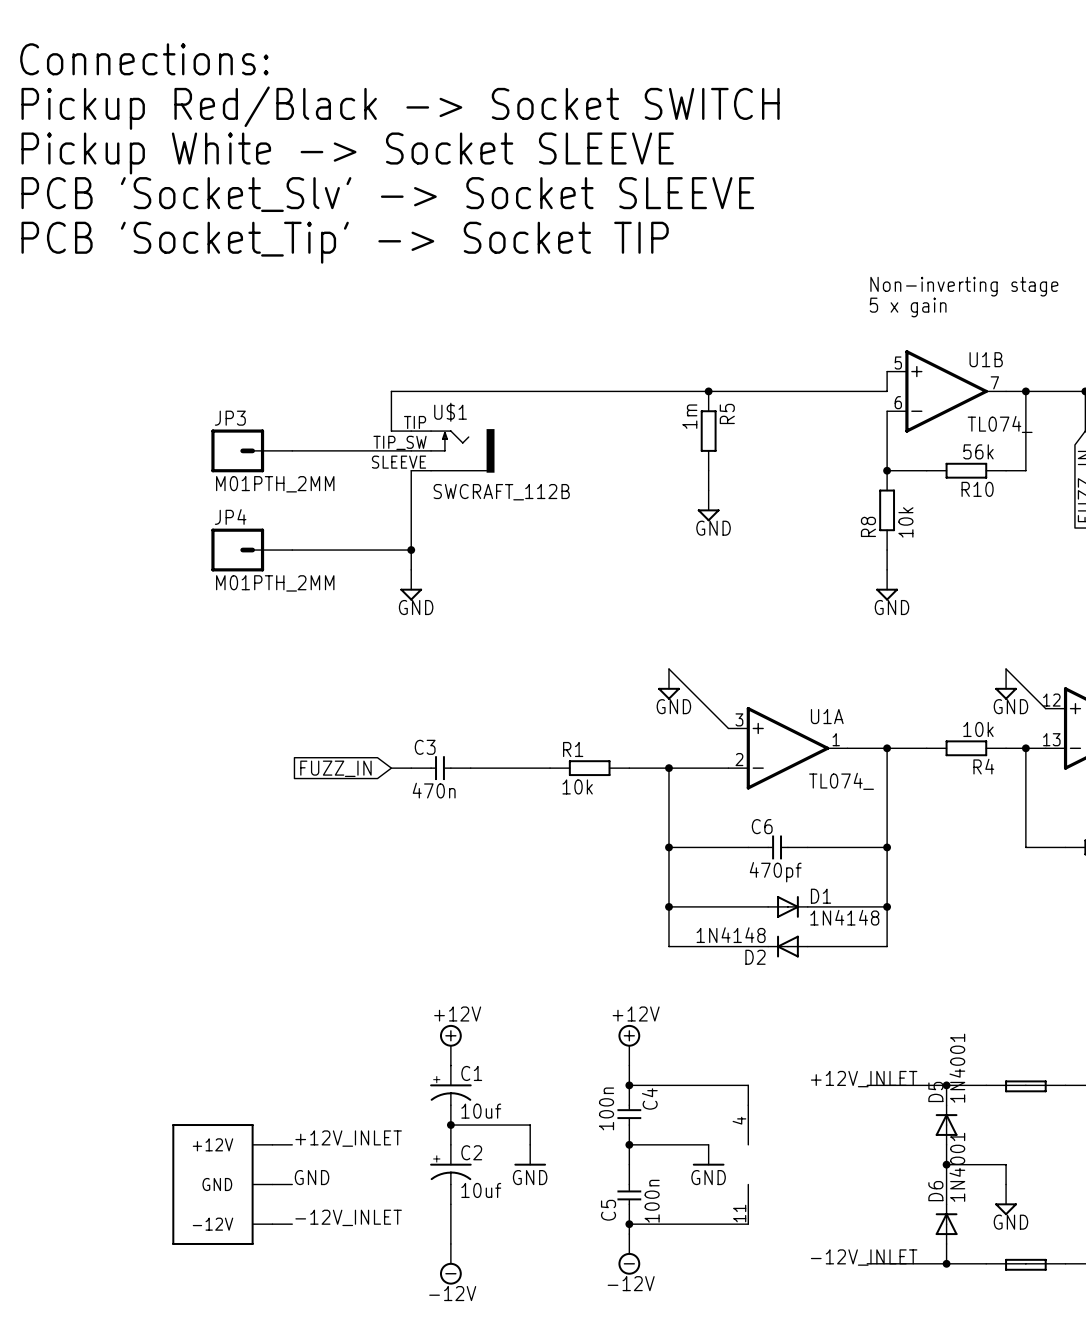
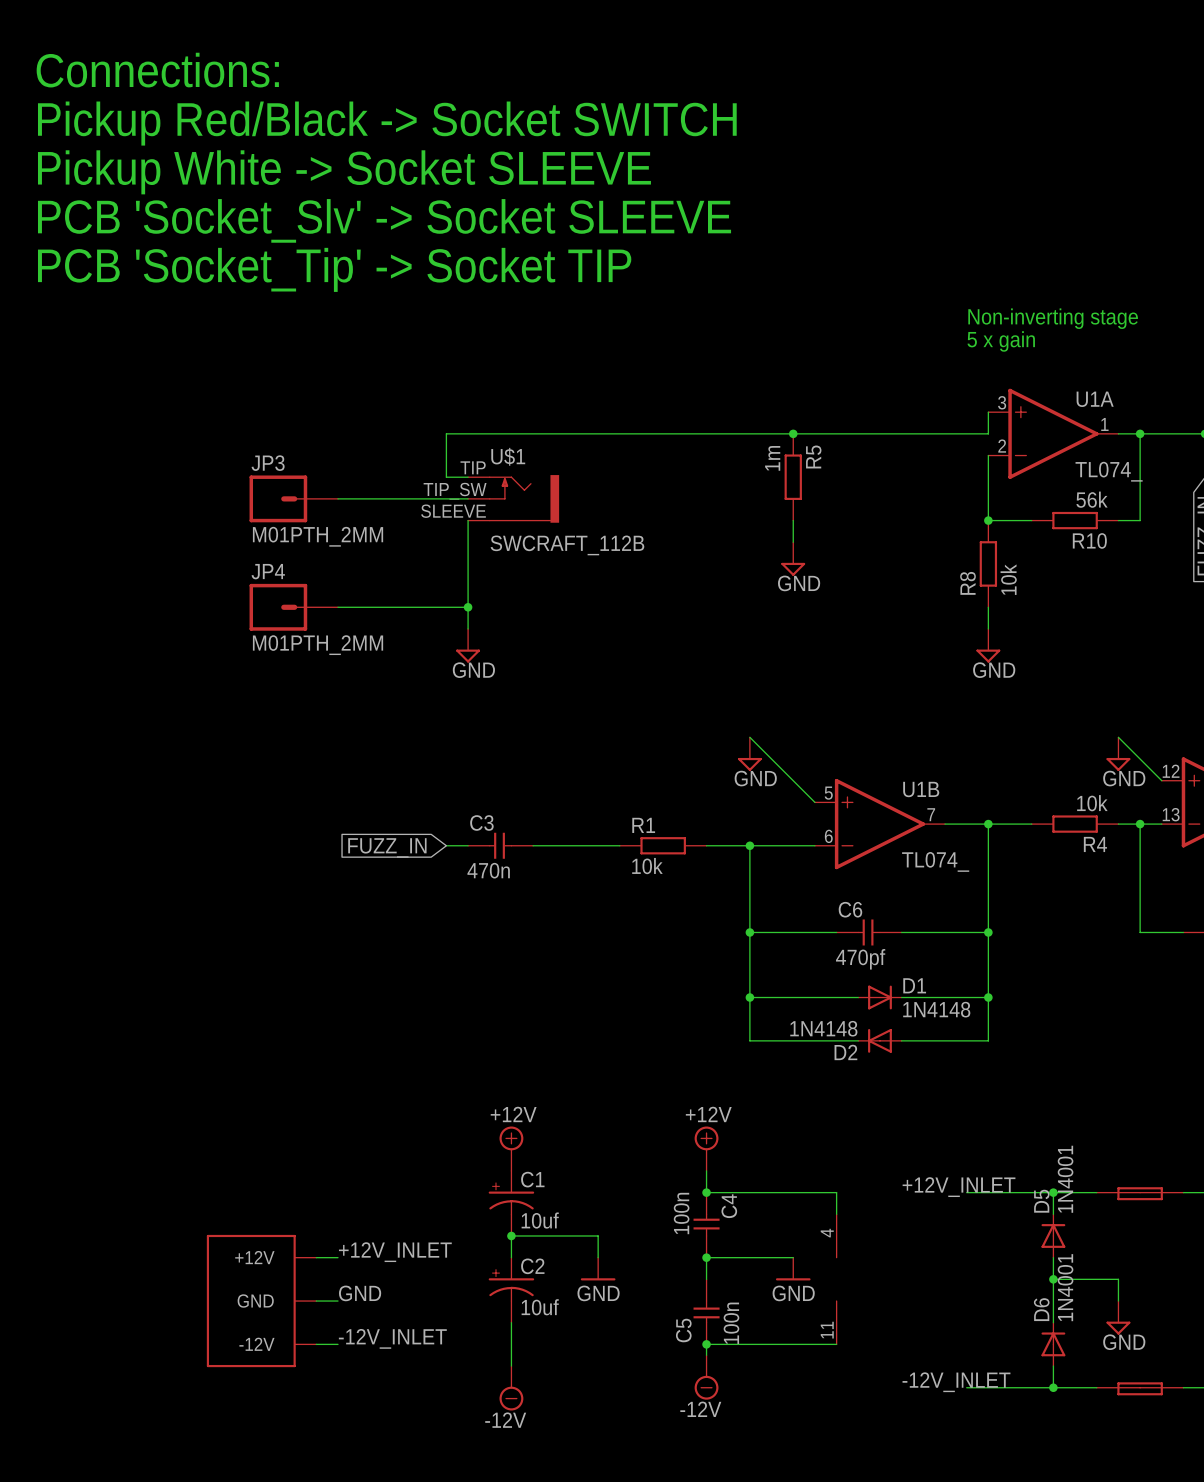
U1B position: (946, 391) -> (879, 824)
U1A position: (787, 748) -> (1053, 433)

